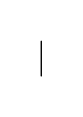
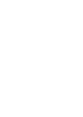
bus: (41, 41) (41, 75) -> none

